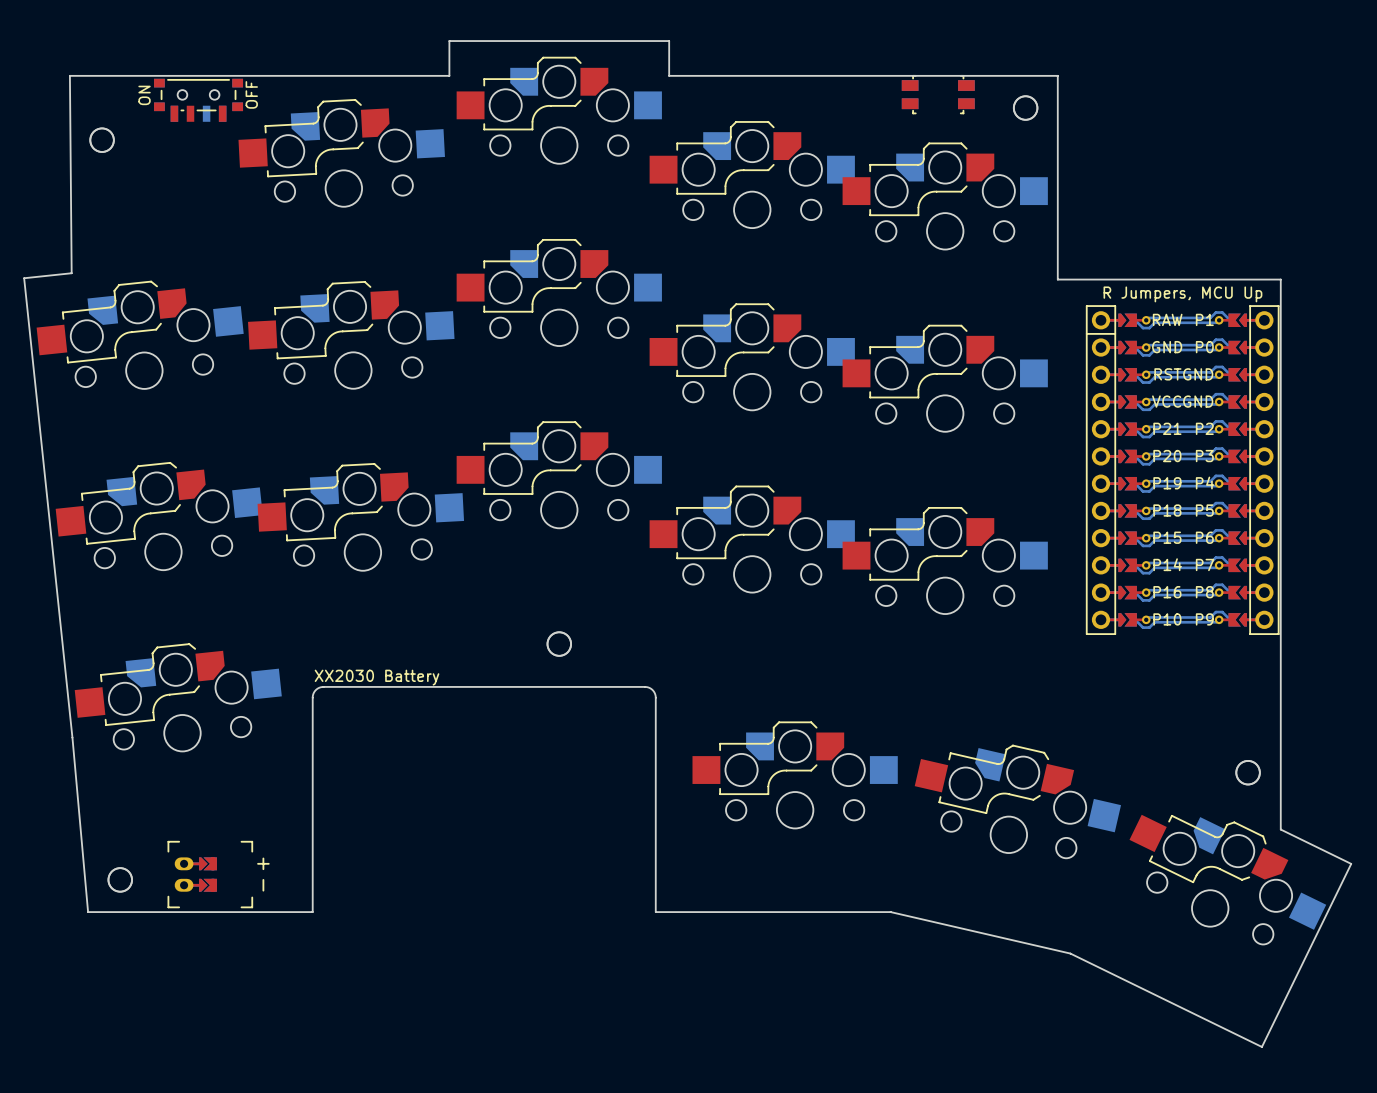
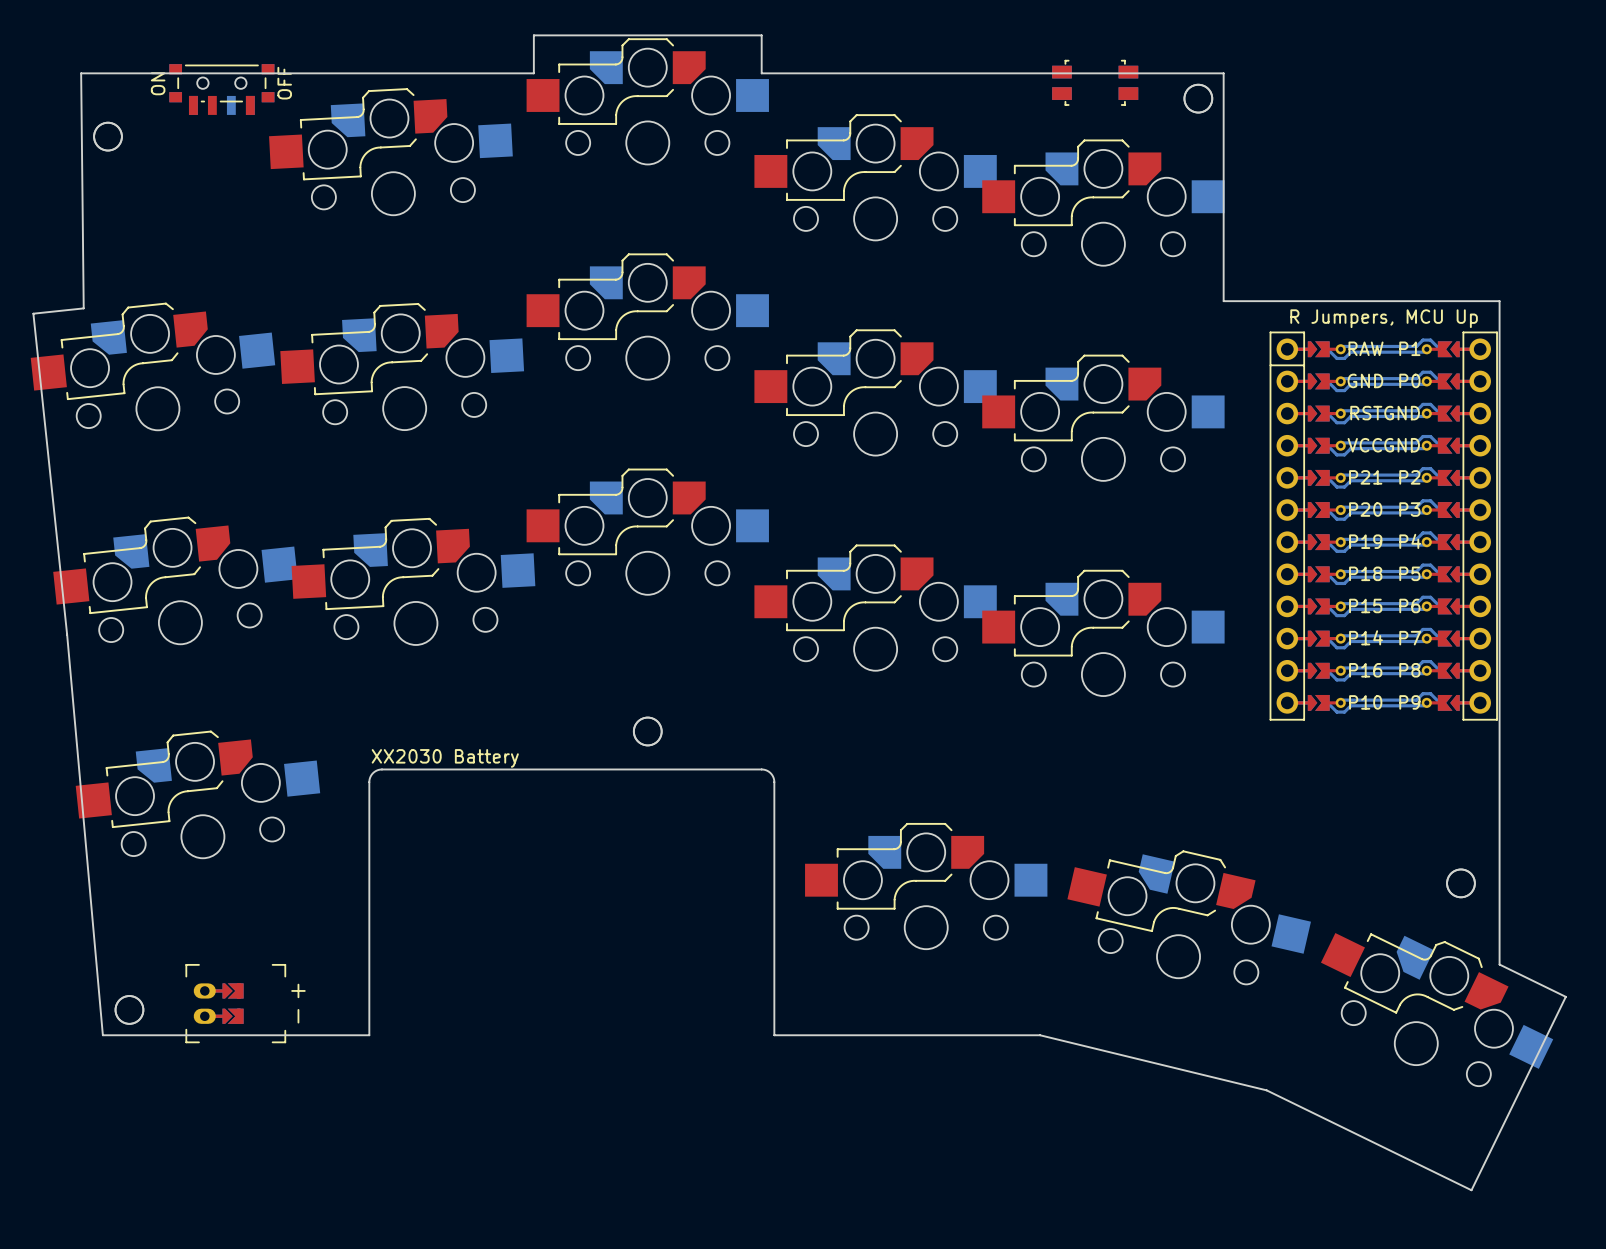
board edge: (1057, 279) (1057, 75) (669, 75) (669, 41) (449, 41) (449, 75) (69, 75) (71, 273) (24, 278) (72, 737) (88, 912) (312, 912) (312, 697) (315, 690) (319, 687) (646, 687) (653, 690) (655, 697) (655, 912) (890, 912) (1070, 953) (1261, 1046) (1351, 863) (1280, 829) -> (1236, 301) (1223, 301) (1223, 73) (761, 73) (761, 35) (533, 35) (533, 73) (81, 73) (83, 308) (33, 313) (67, 634) (102, 1035) (369, 1035) (369, 782) (373, 773) (380, 769) (765, 770) (772, 775) (774, 782) (774, 1035) (1040, 1035) (1266, 1090) (1471, 1190) (1565, 996) (1499, 964) (1499, 950)
text position: XX2030 Battery (377, 677) -> XX2030 Battery (445, 758)

